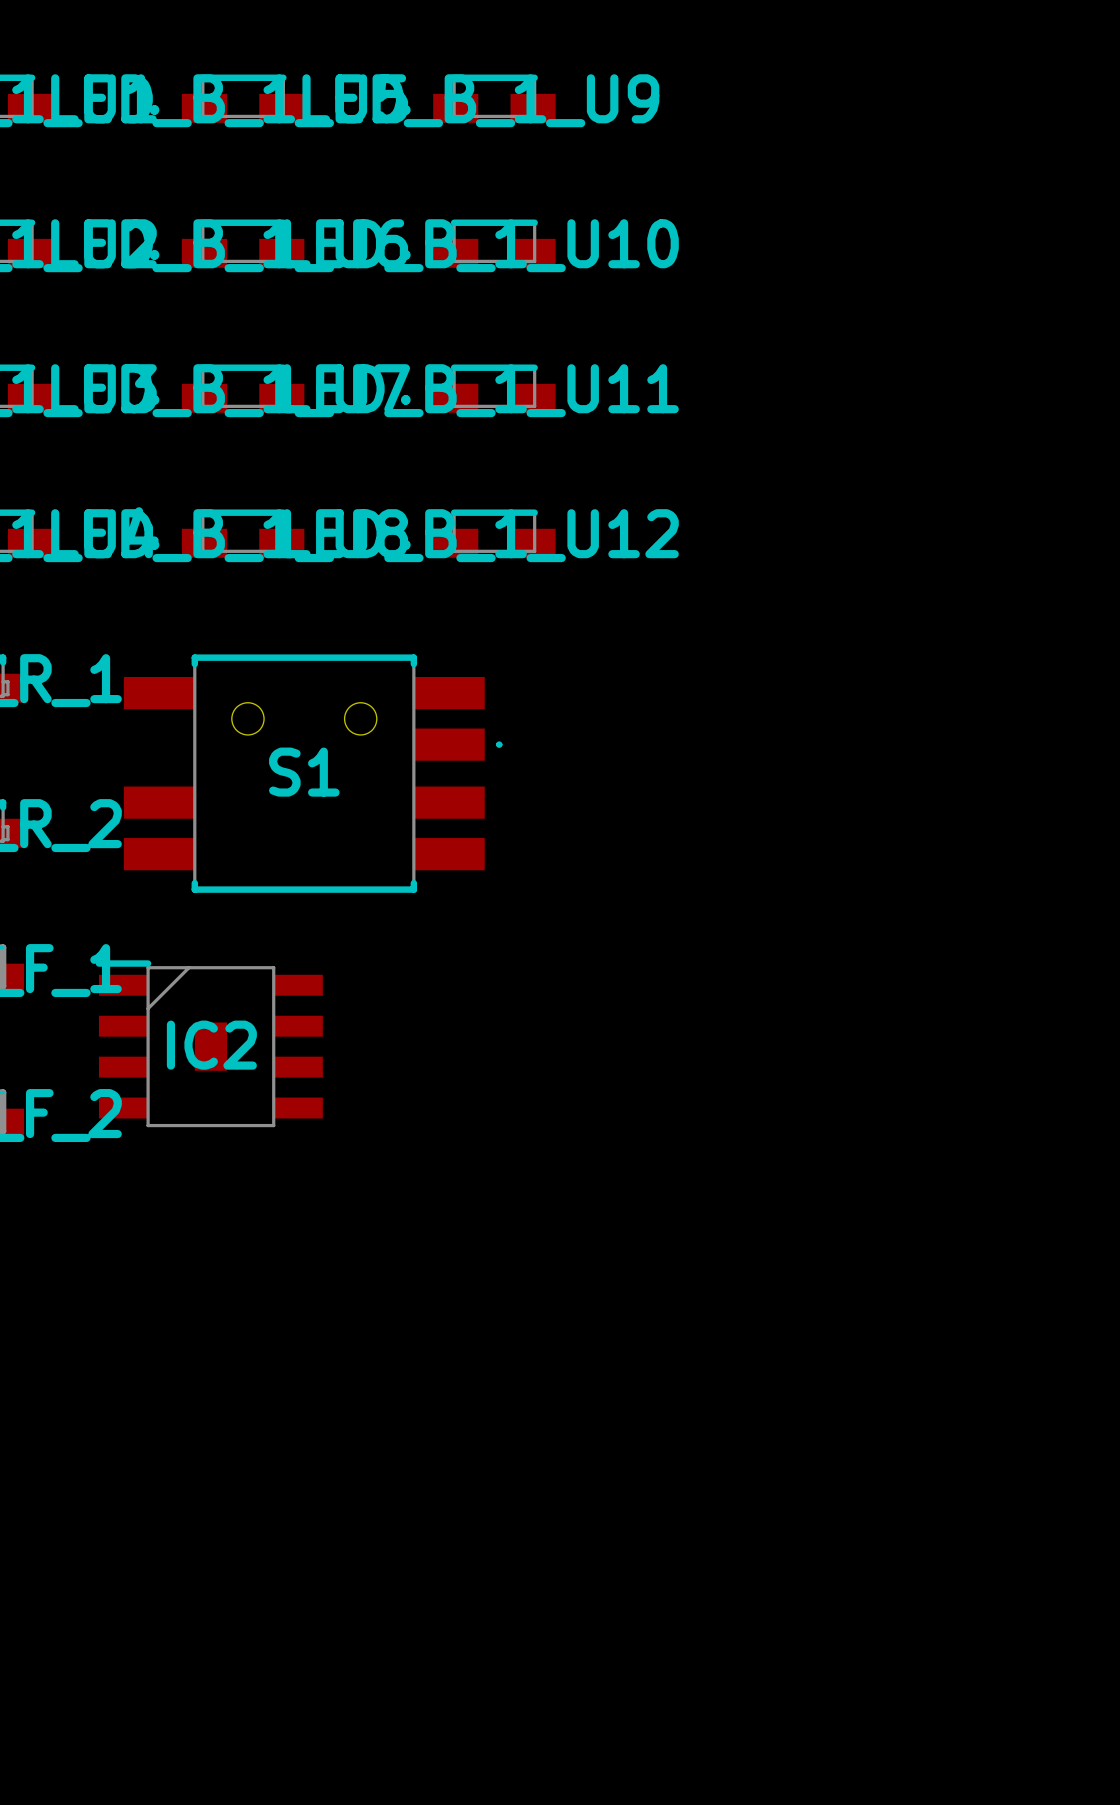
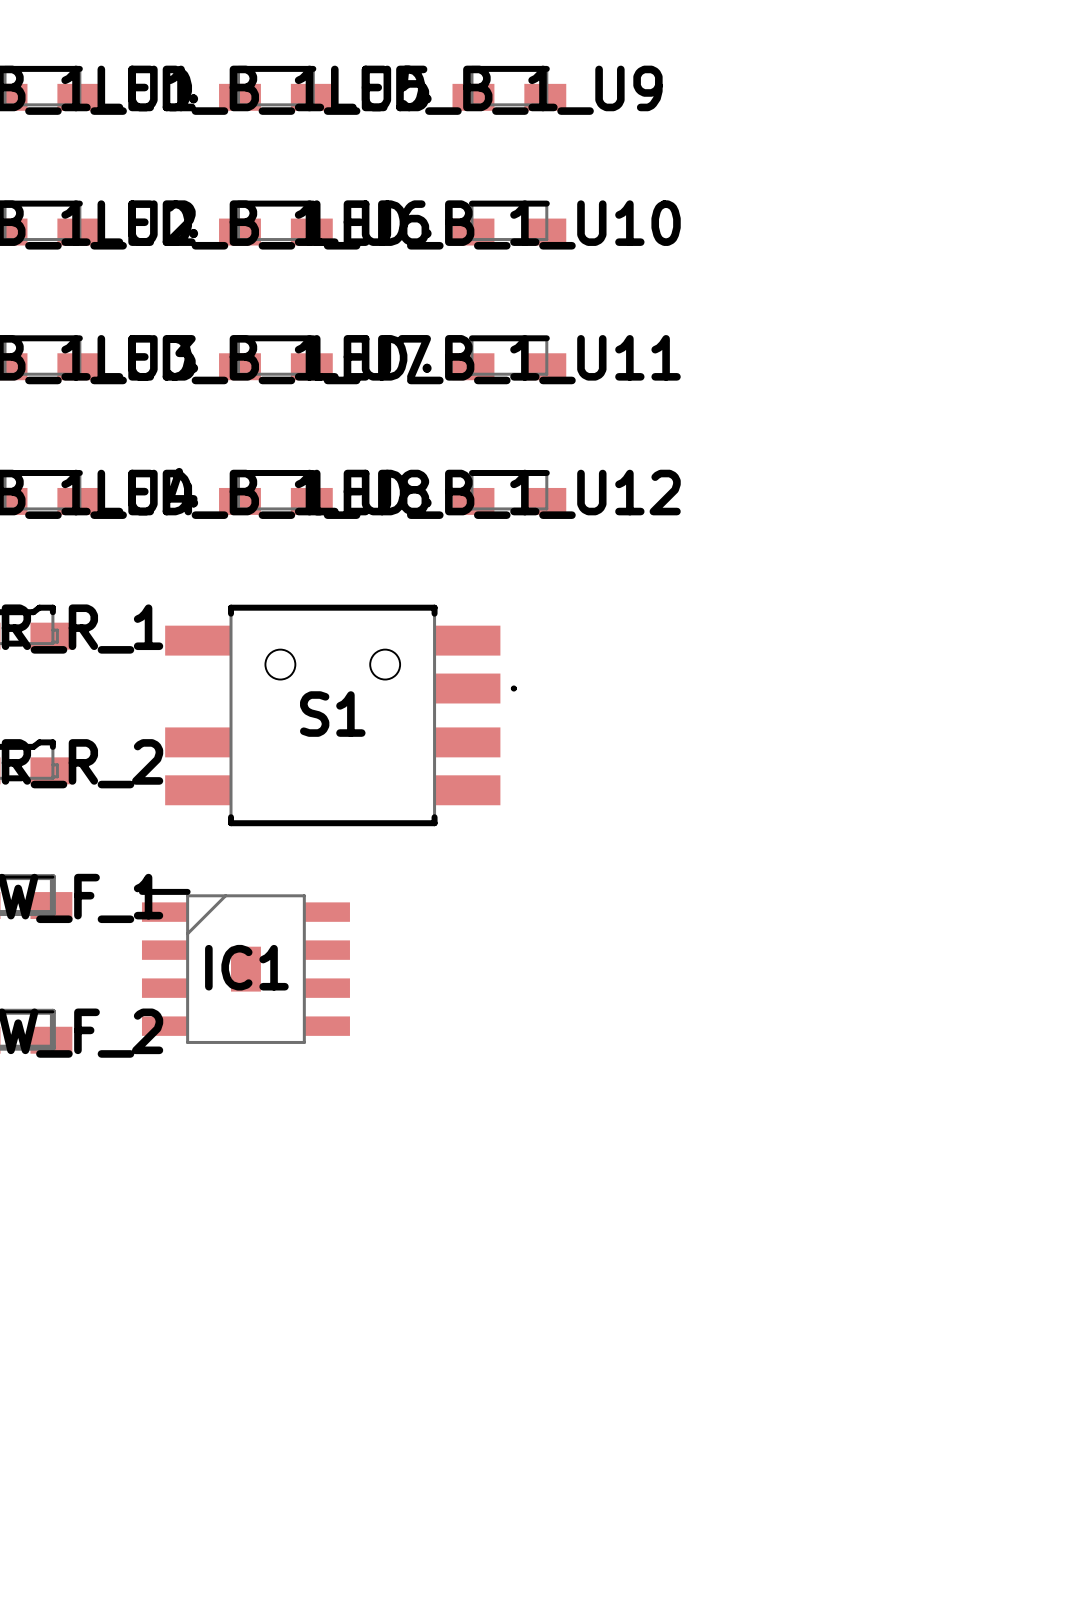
IC2 name: IC2 (211, 1045) -> IC1 (246, 967)

